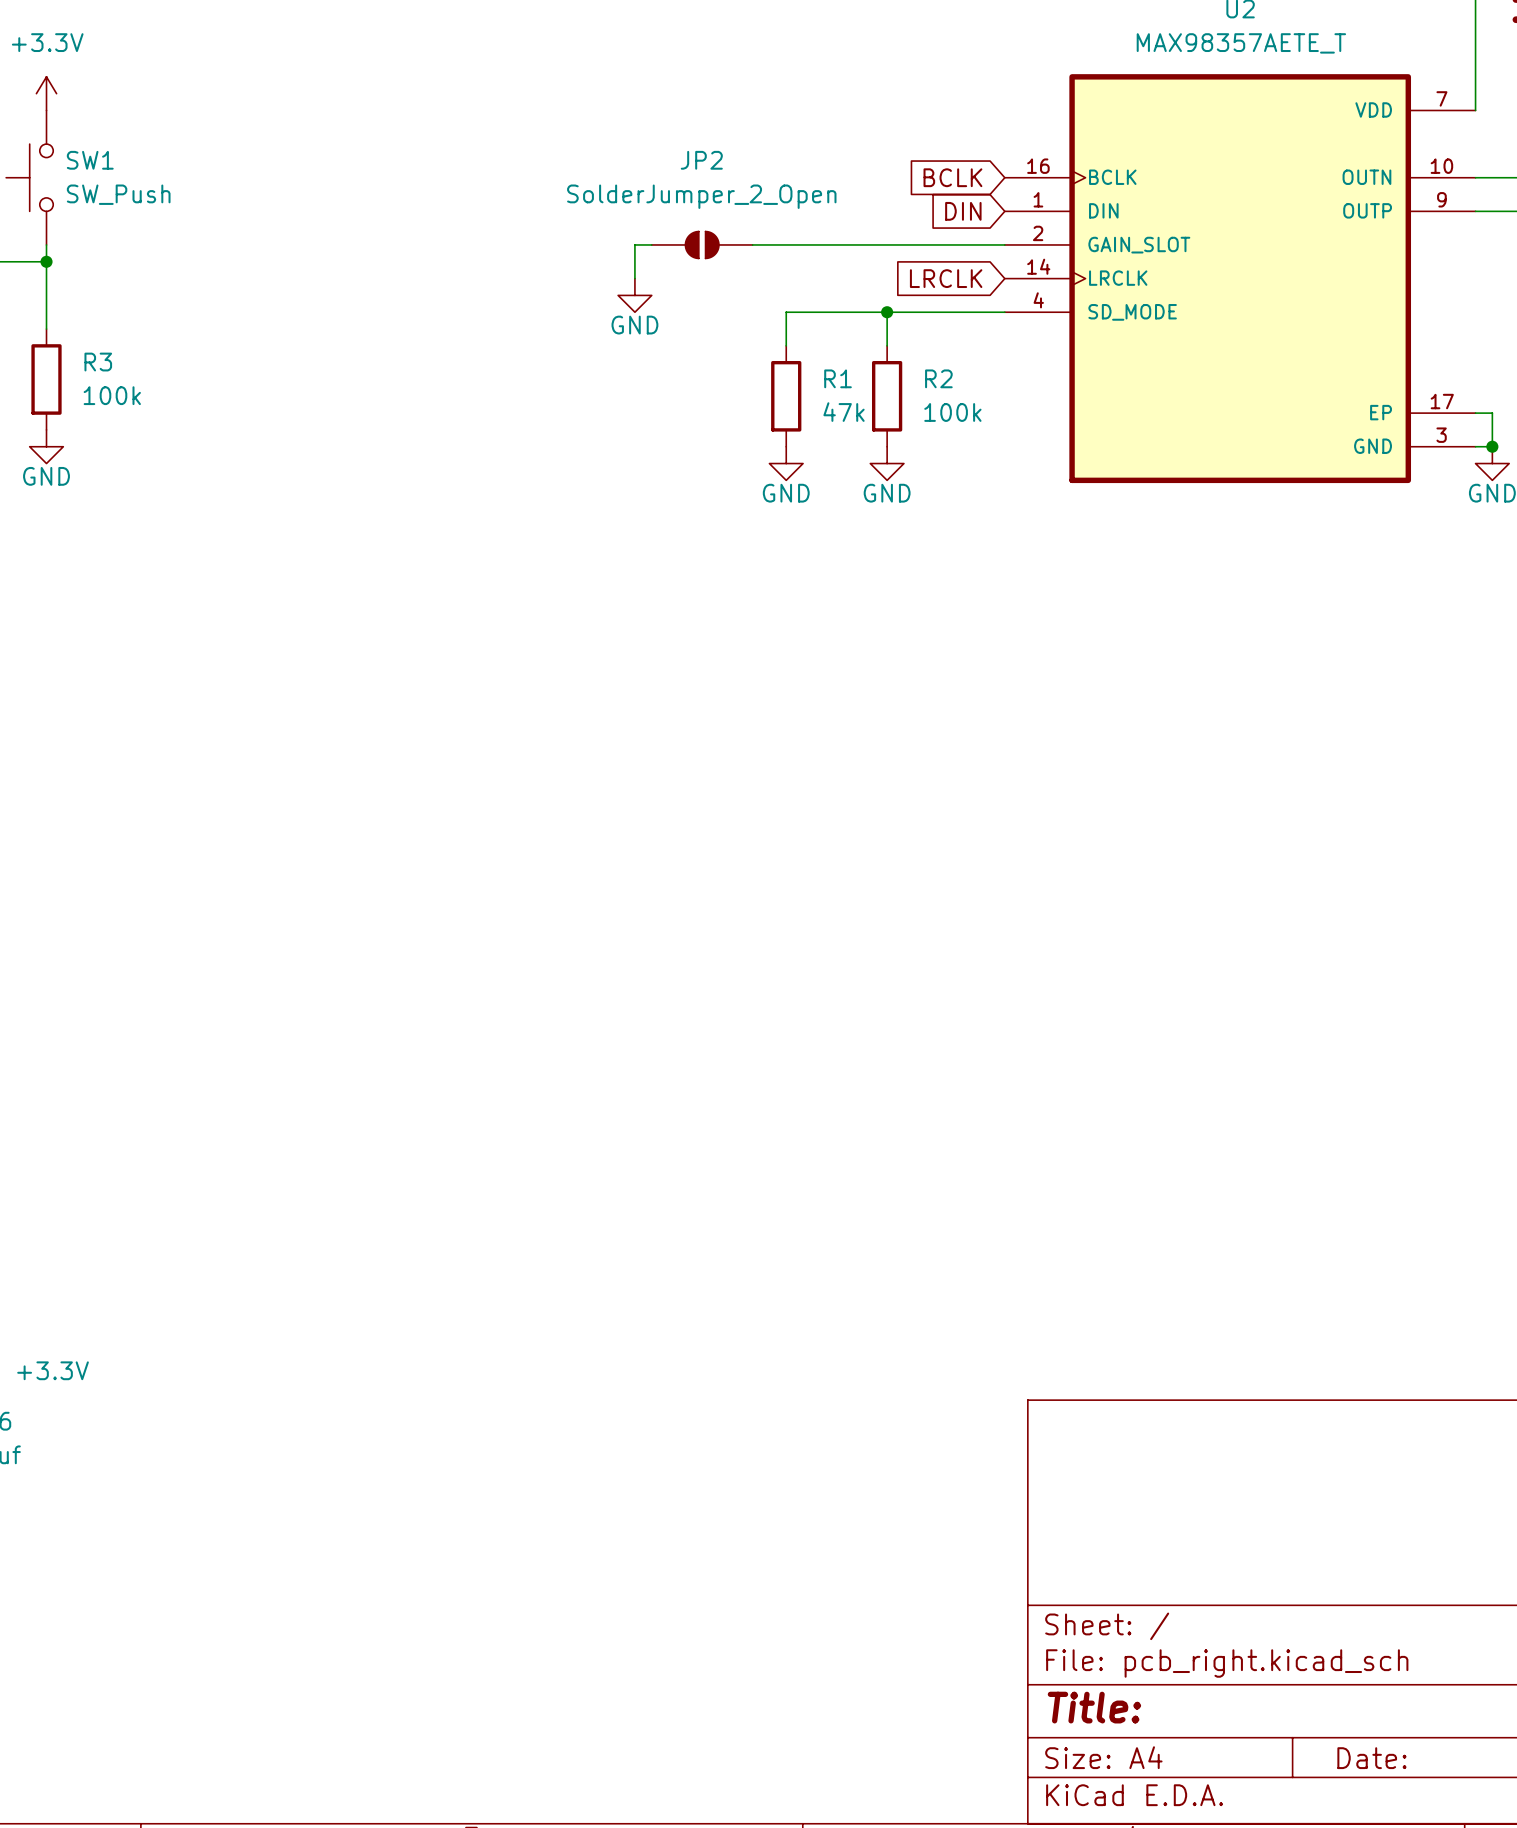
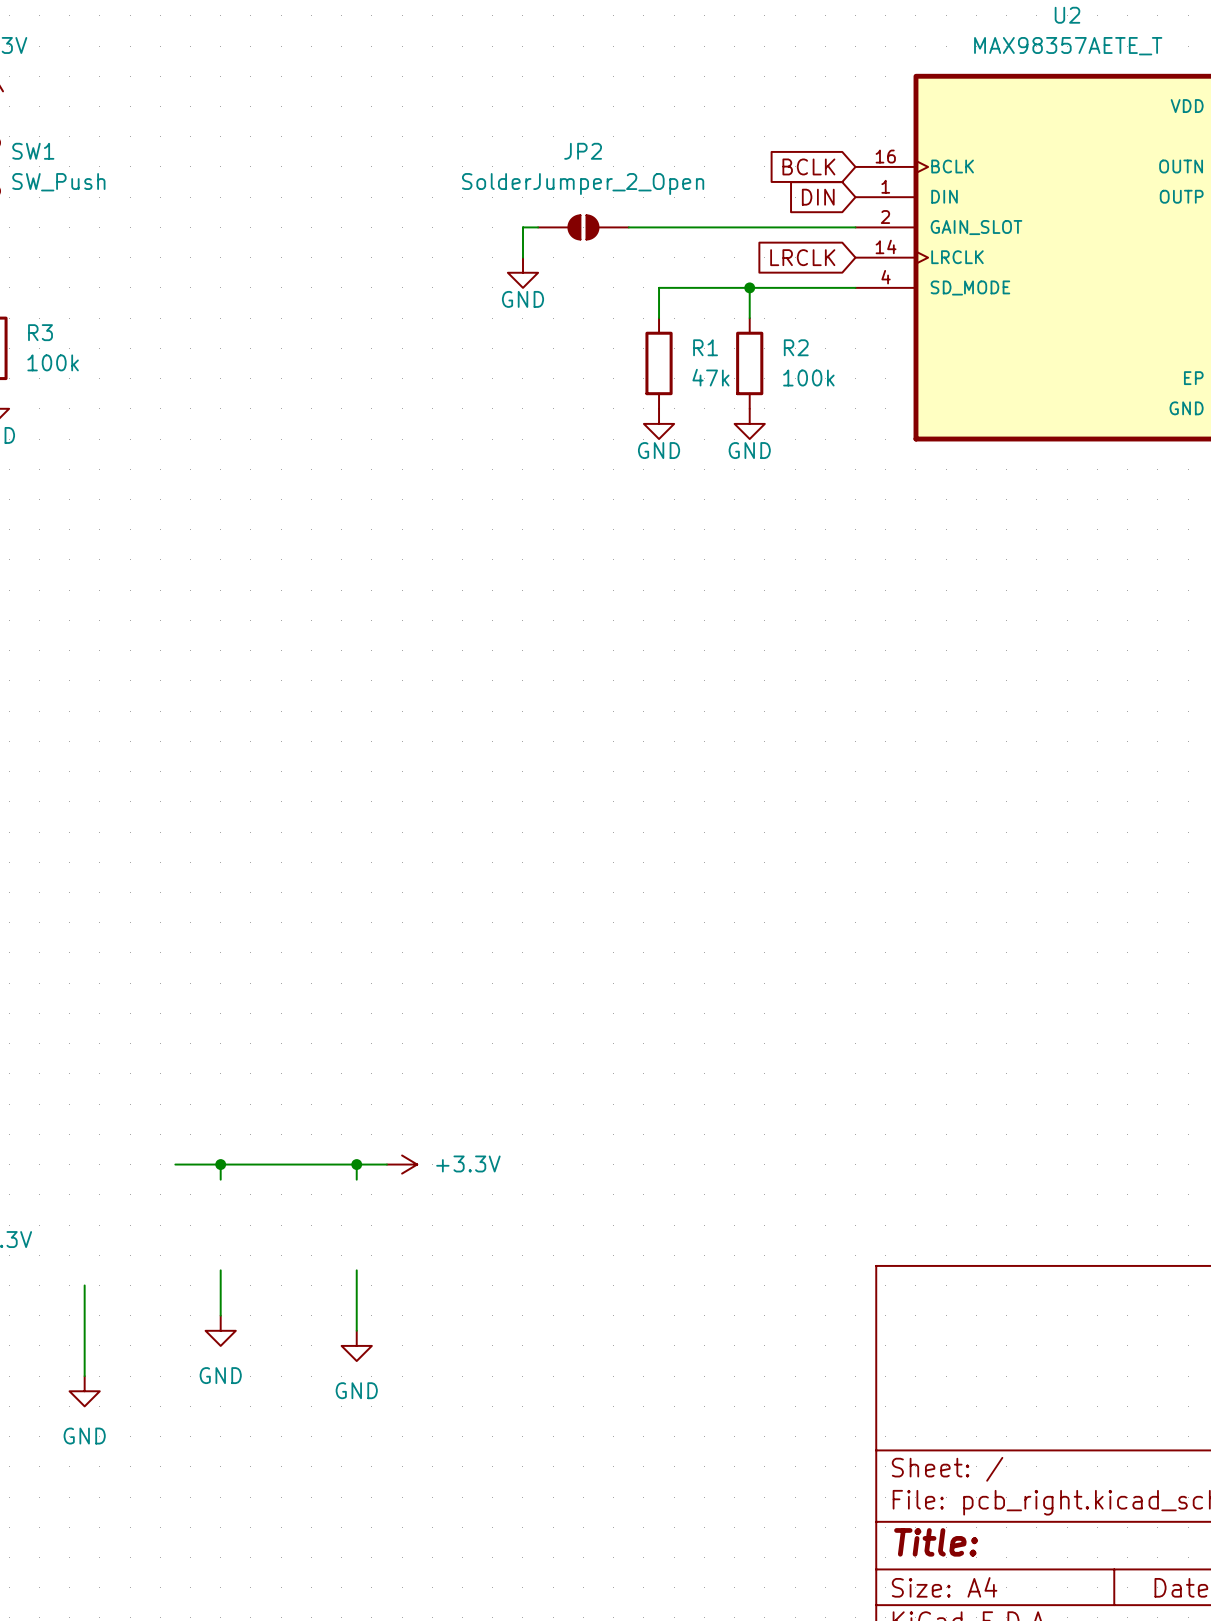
wire: none -> (175, 1164) (386, 1164)
wire: none -> (220, 1164) (220, 1179)
junction: none -> (220, 1164)
wire: none -> (356, 1164) (356, 1179)
junction: none -> (356, 1164)
power symbol: none -> +3.3V (402, 1164)
wire: none -> (220, 1270) (220, 1315)
wire: none -> (356, 1270) (356, 1330)
wire: none -> (84, 1285) (84, 1376)
power symbol: none -> GND (220, 1330)
power symbol: none -> GND (356, 1345)
power symbol: none -> GND (84, 1391)

